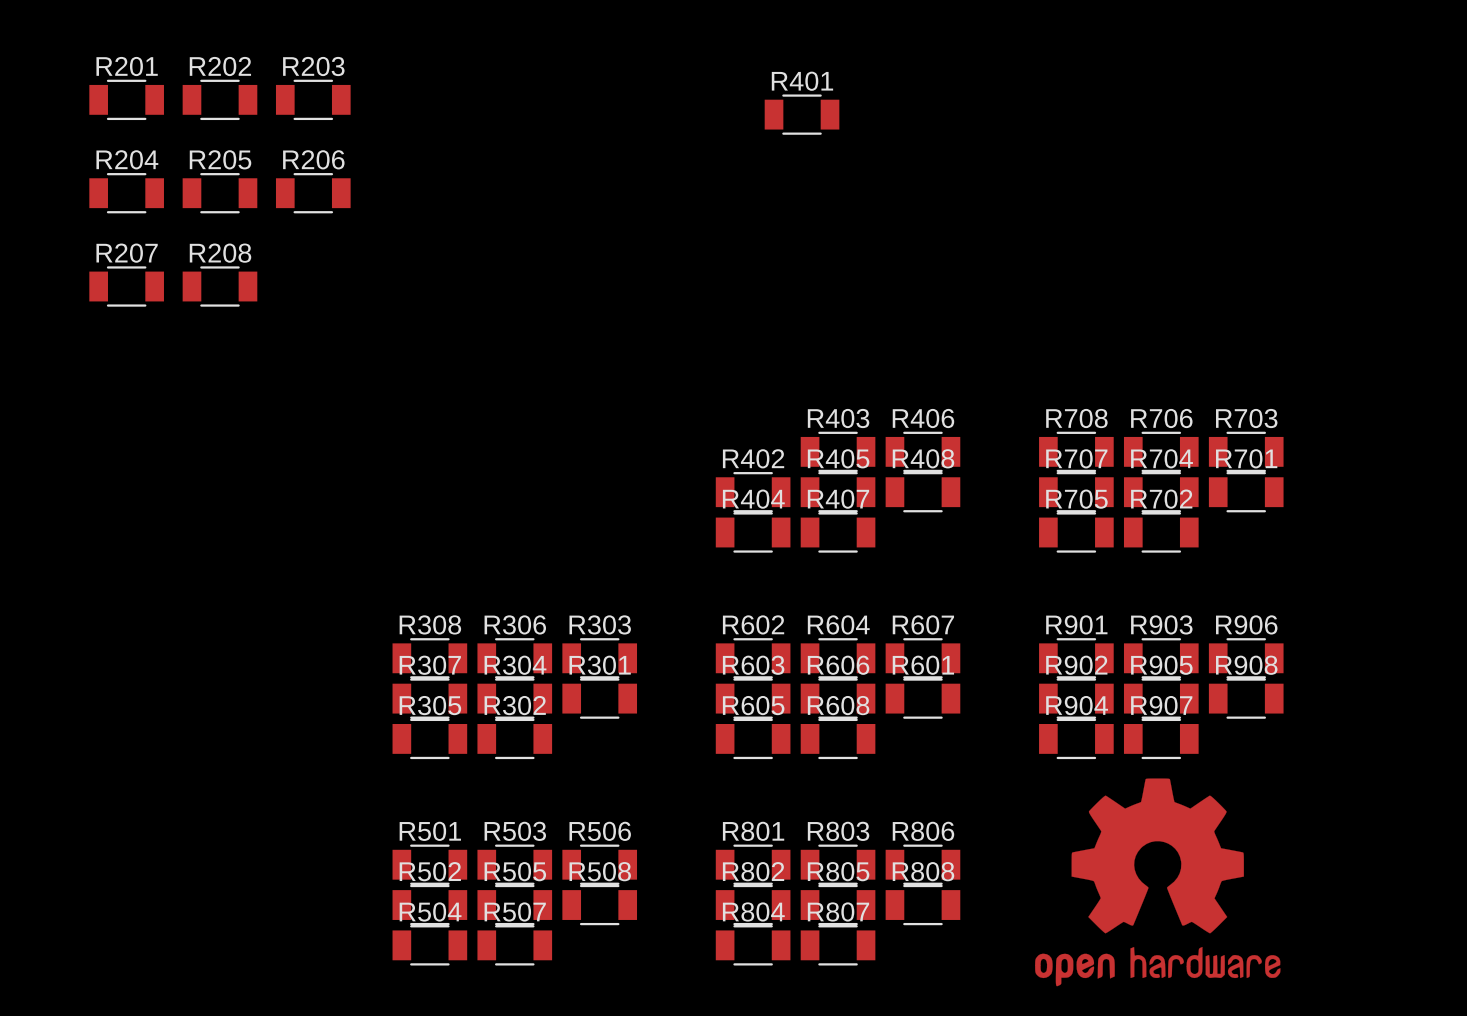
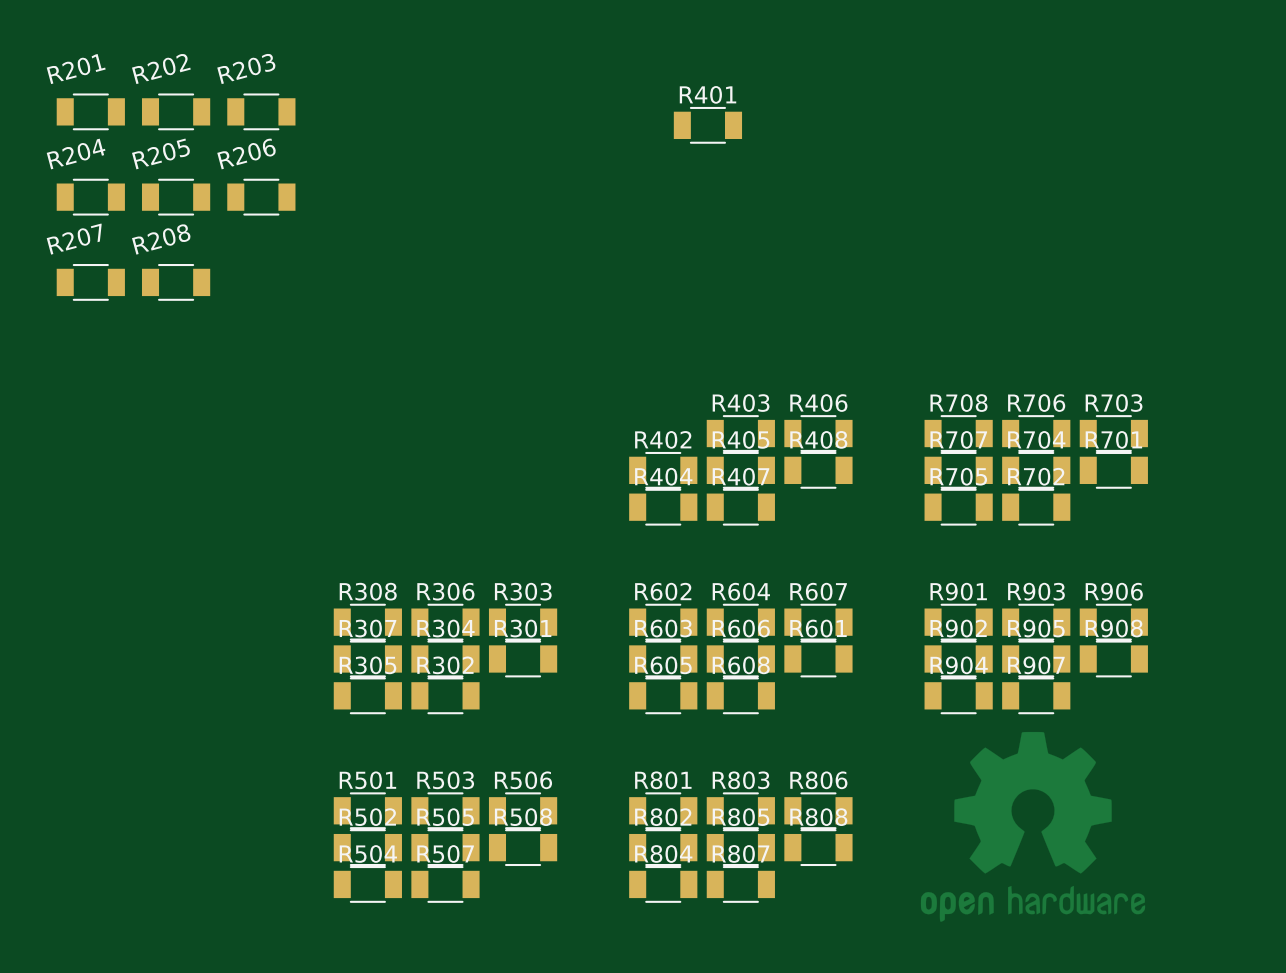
R201 name rotation: 0° (127, 66) -> 15° counterclockwise (76, 69)
R202 name rotation: 0° (220, 66) -> 15° counterclockwise (161, 68)
R203 name rotation: 0° (313, 66) -> 15° counterclockwise (246, 68)
R204 name rotation: 0° (127, 159) -> 15° counterclockwise (76, 154)
R205 name rotation: 0° (220, 159) -> 15° counterclockwise (161, 153)
R206 name rotation: 0° (313, 159) -> 15° counterclockwise (246, 154)
R207 name rotation: 0° (127, 253) -> 15° counterclockwise (74, 239)
R208 name rotation: 0° (220, 253) -> 15° counterclockwise (161, 239)

